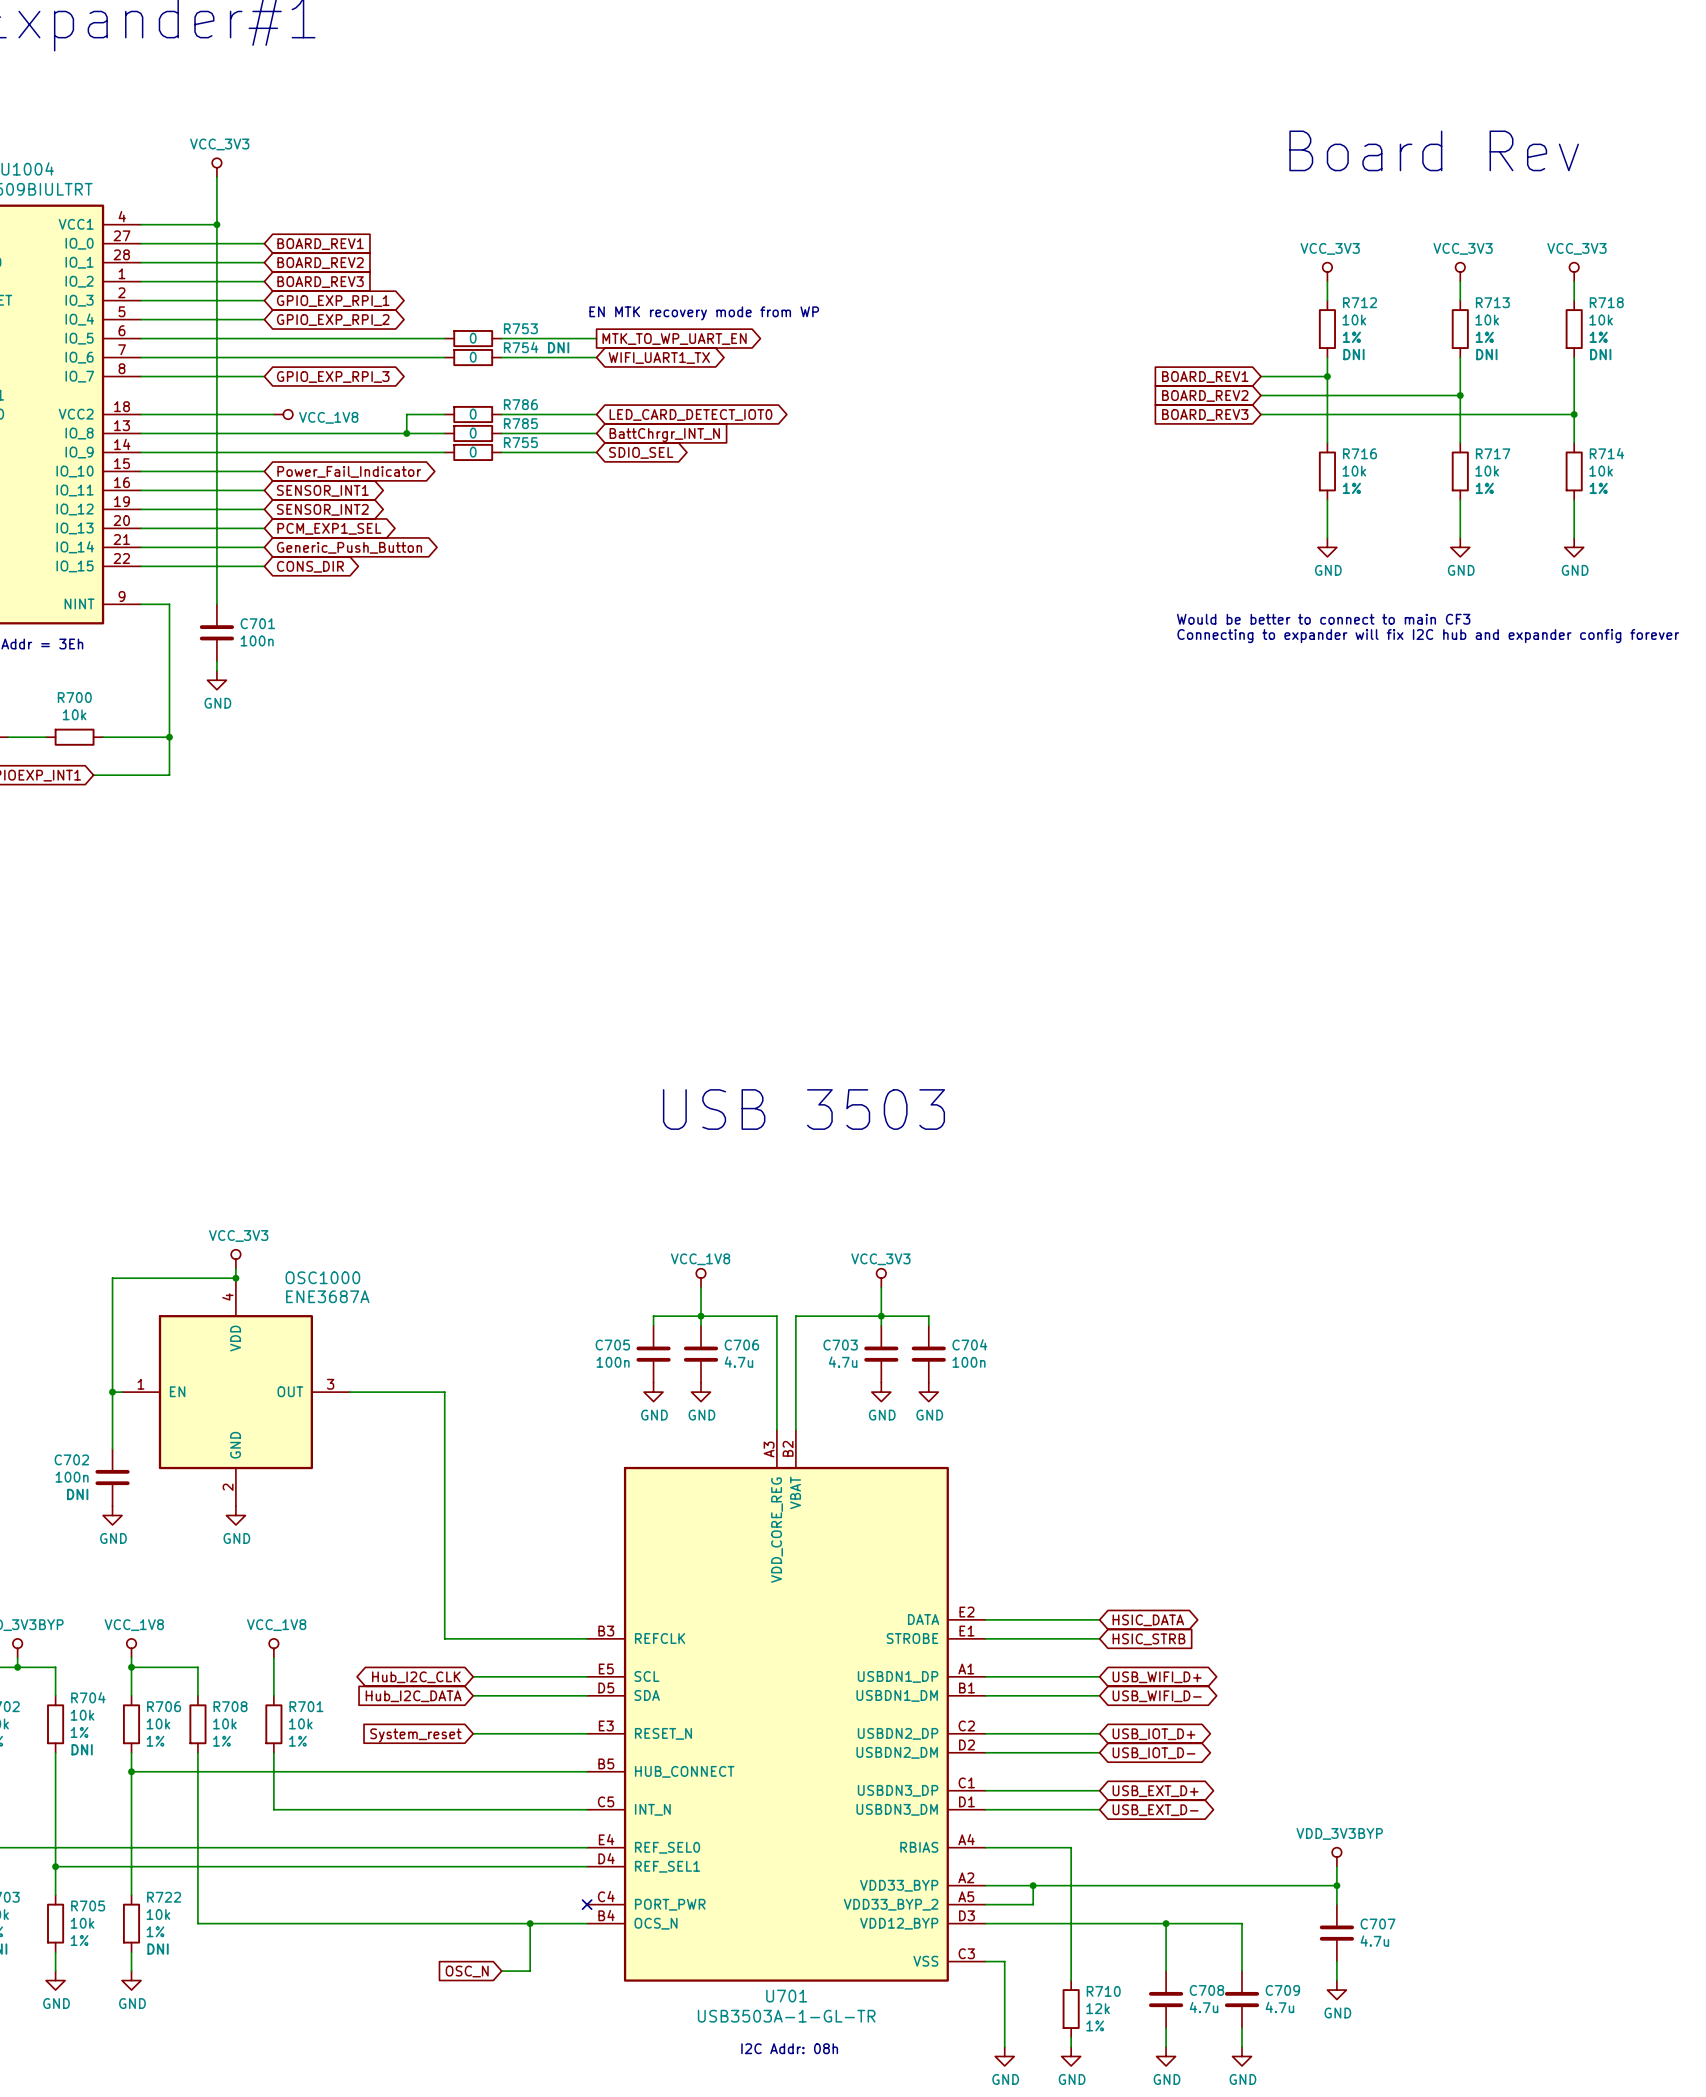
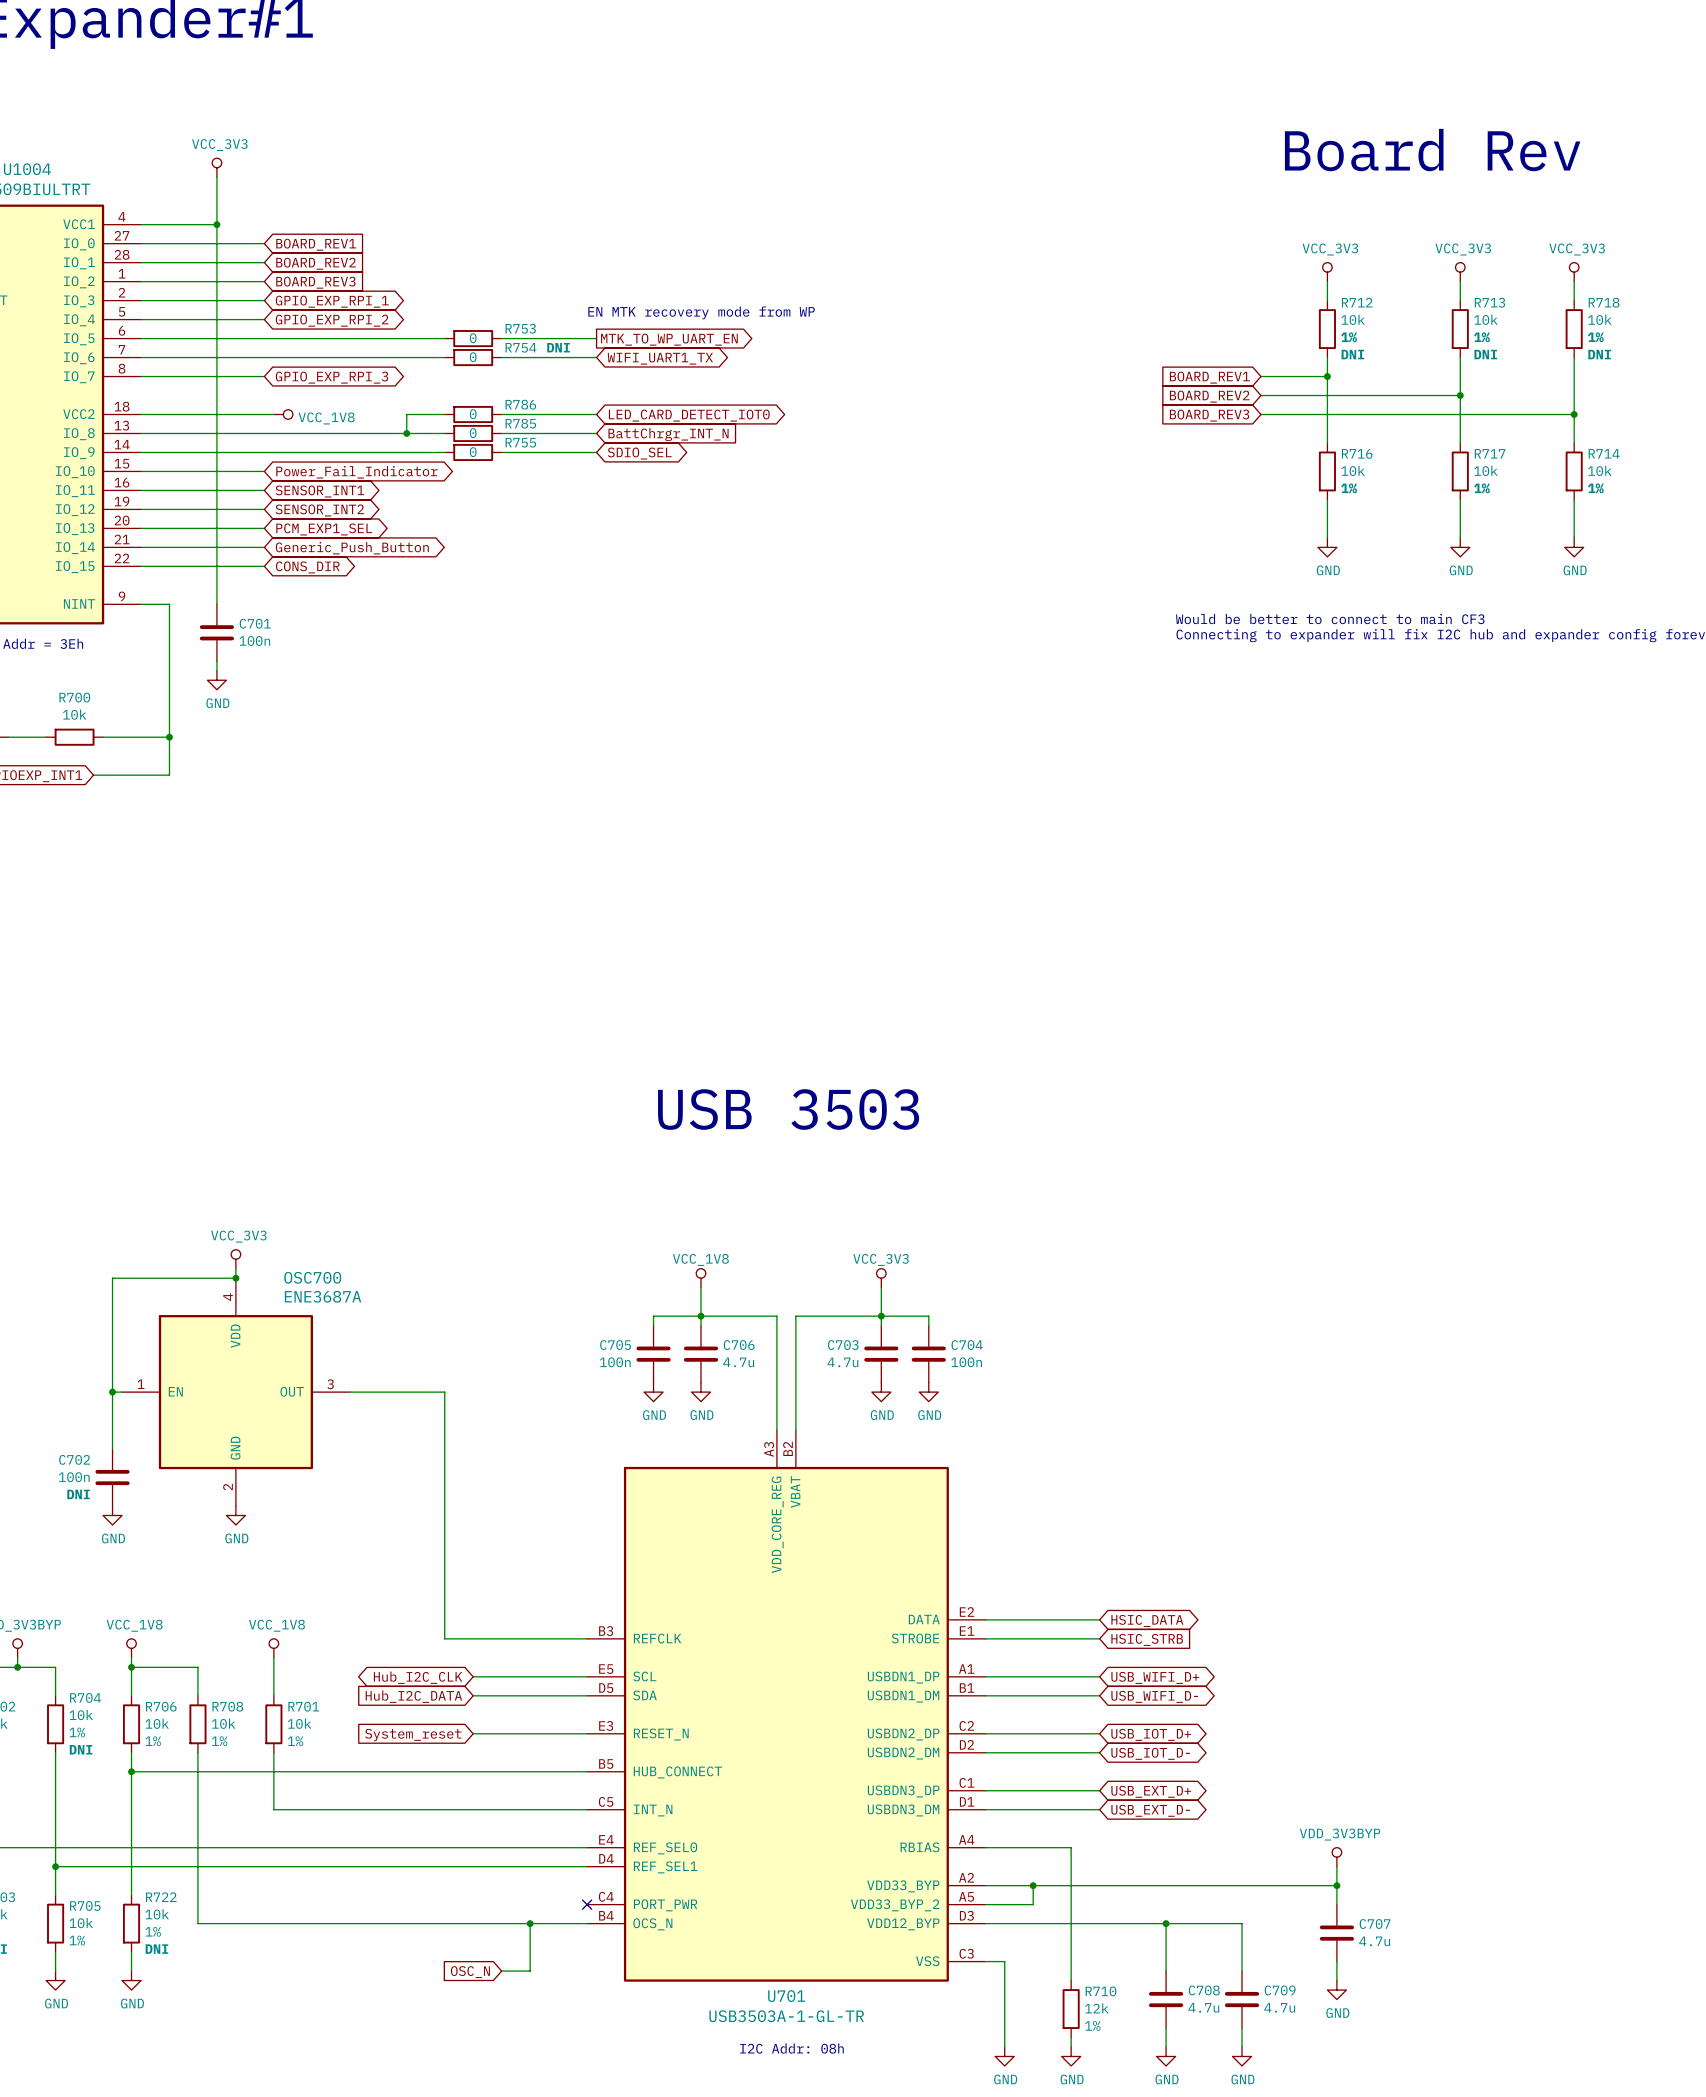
OSC1000 name: OSC1000 (322, 1277) -> OSC700 (312, 1277)

